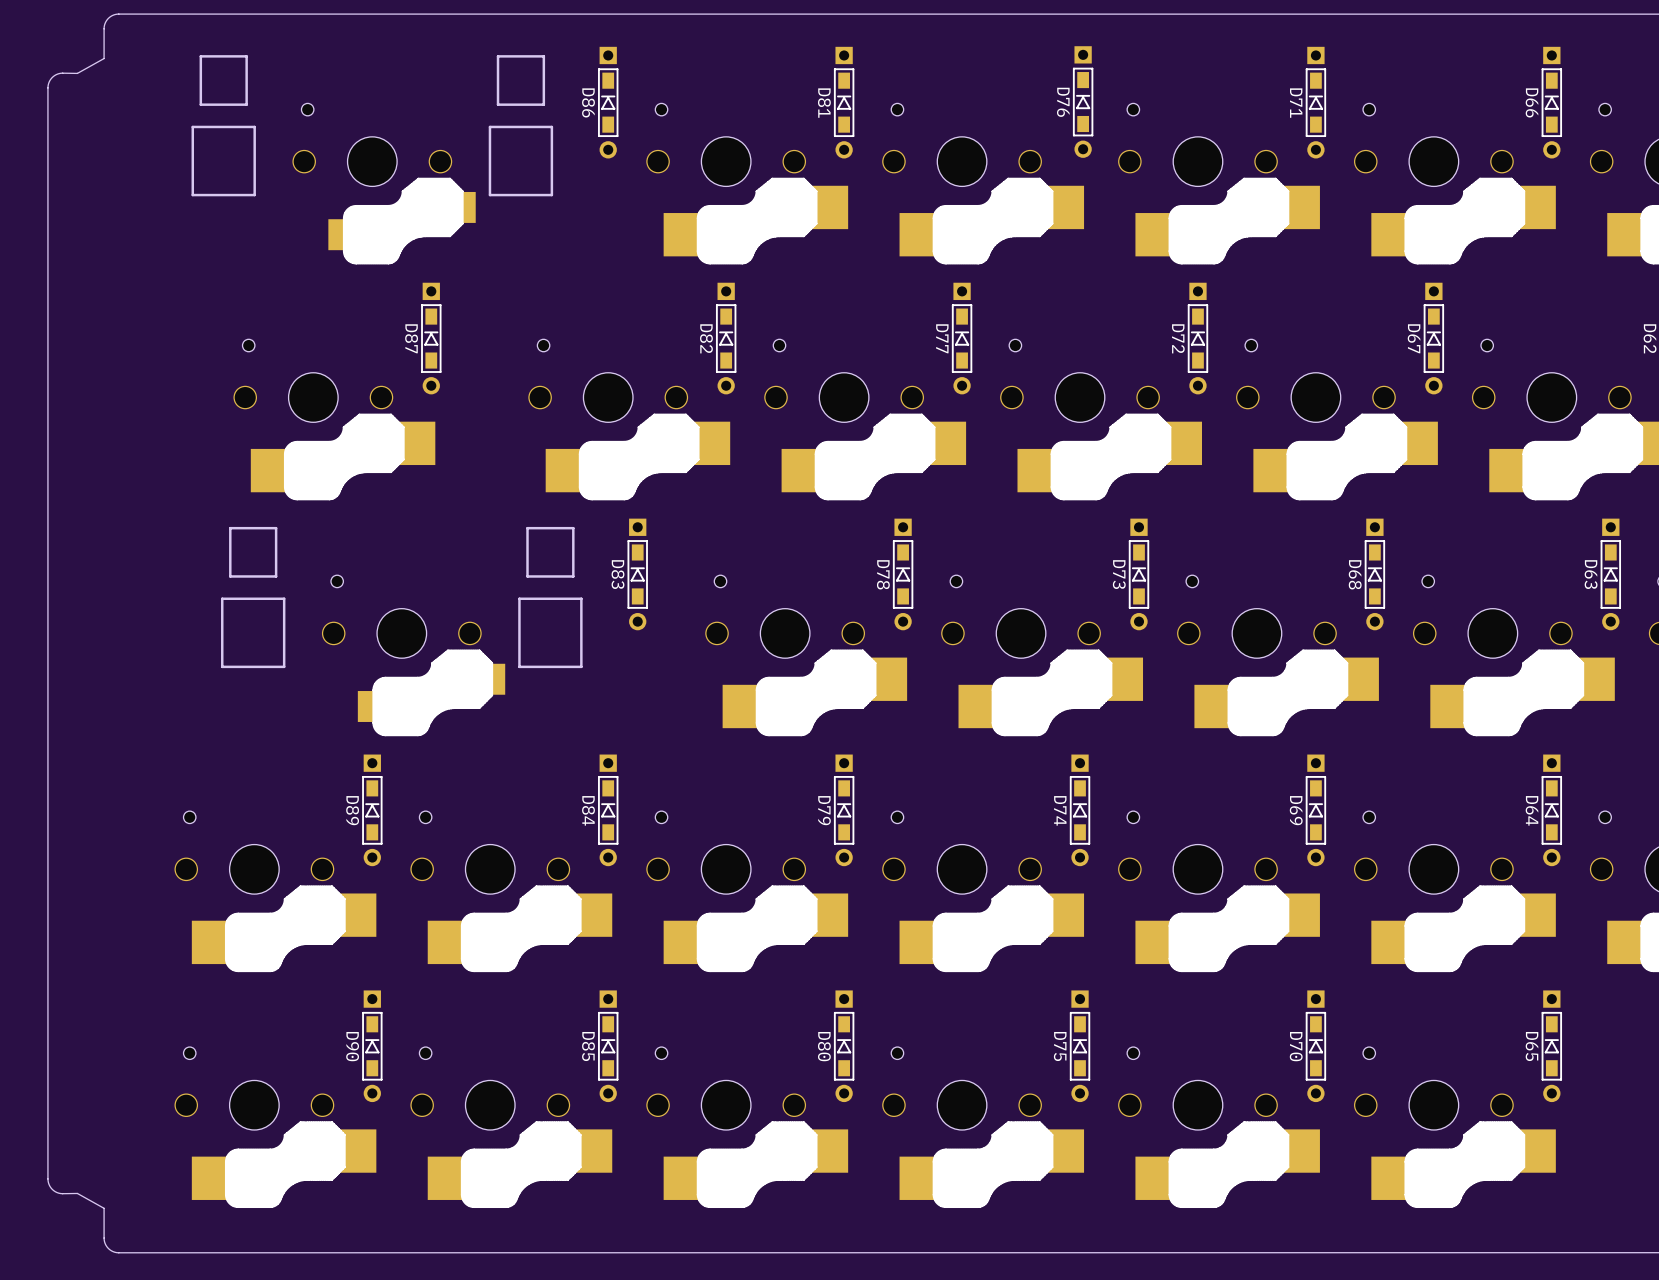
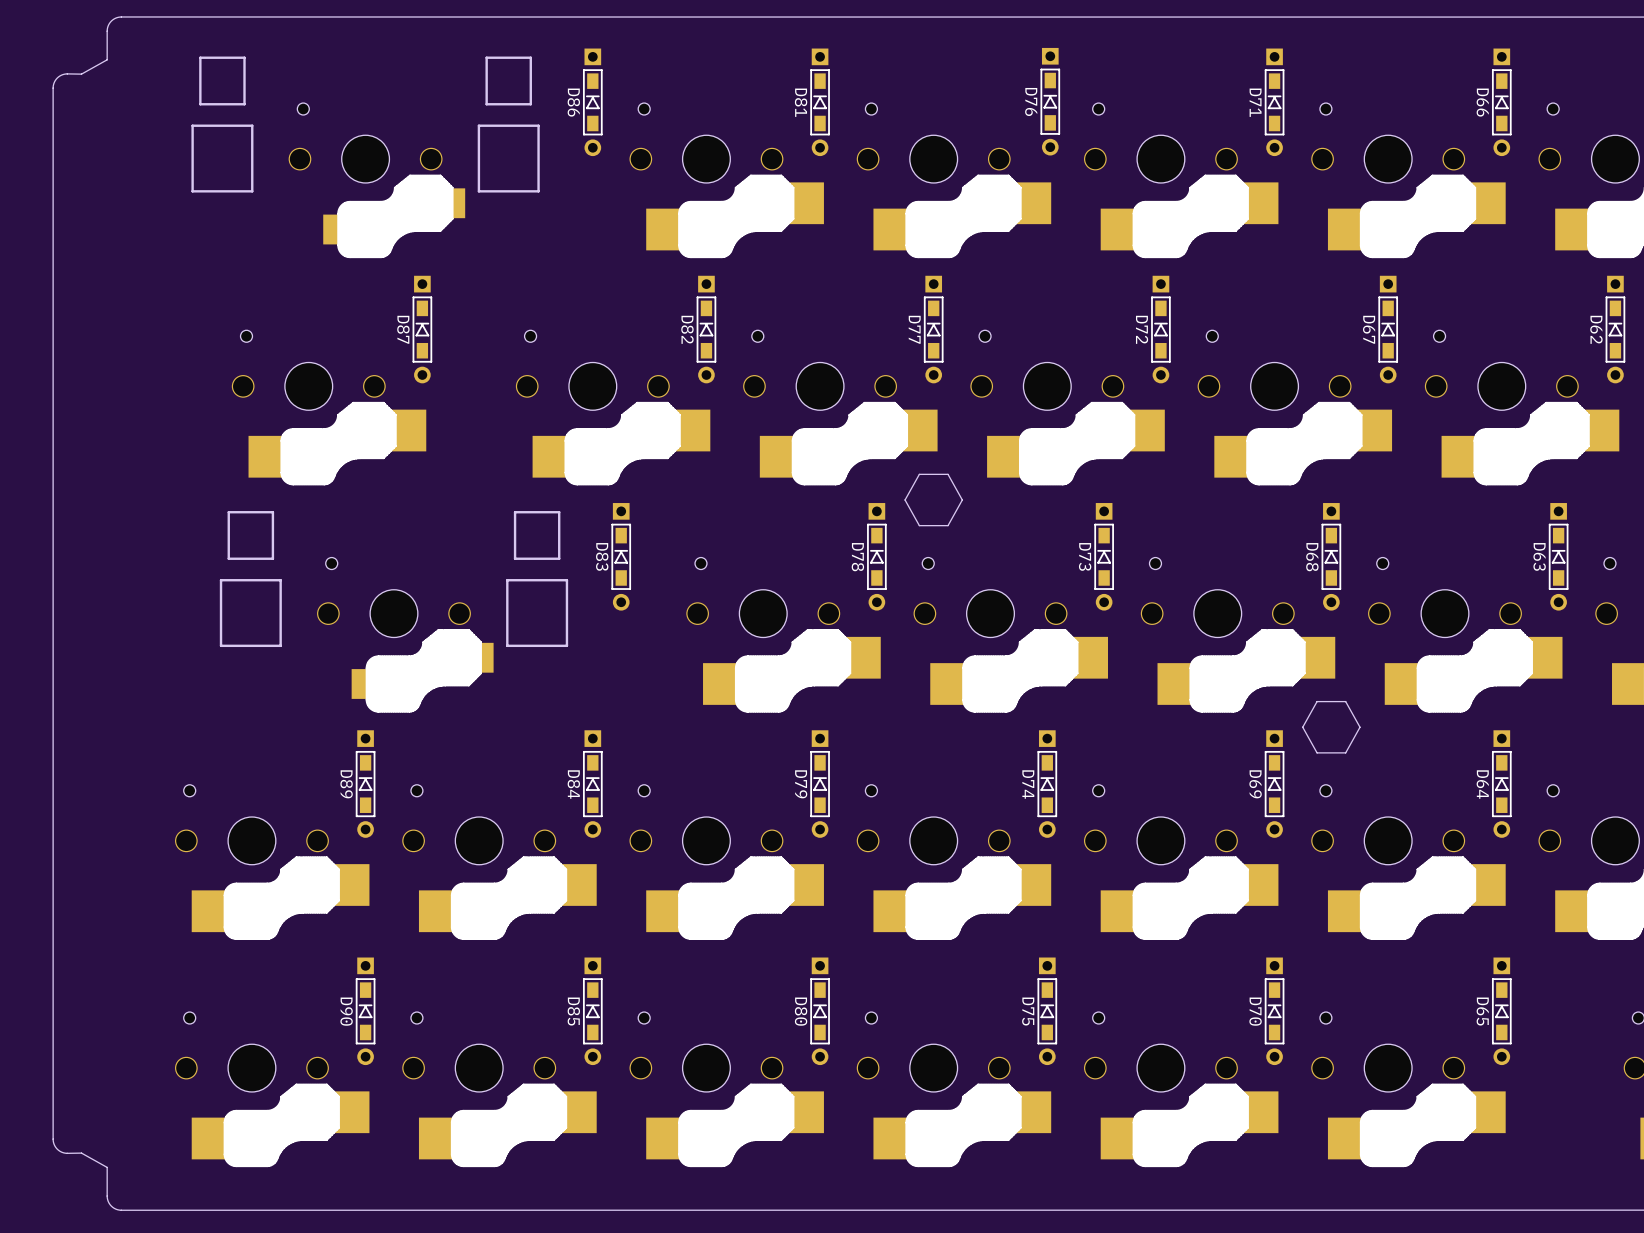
drawing: none -> [904, 473, 963, 527]
drawing: none -> [1302, 701, 1361, 754]

